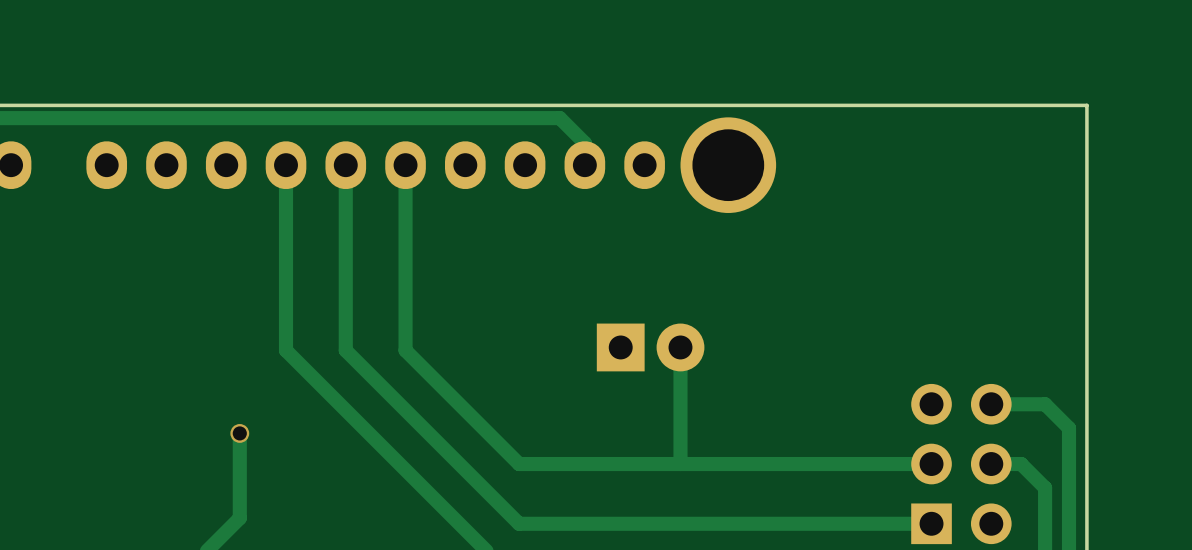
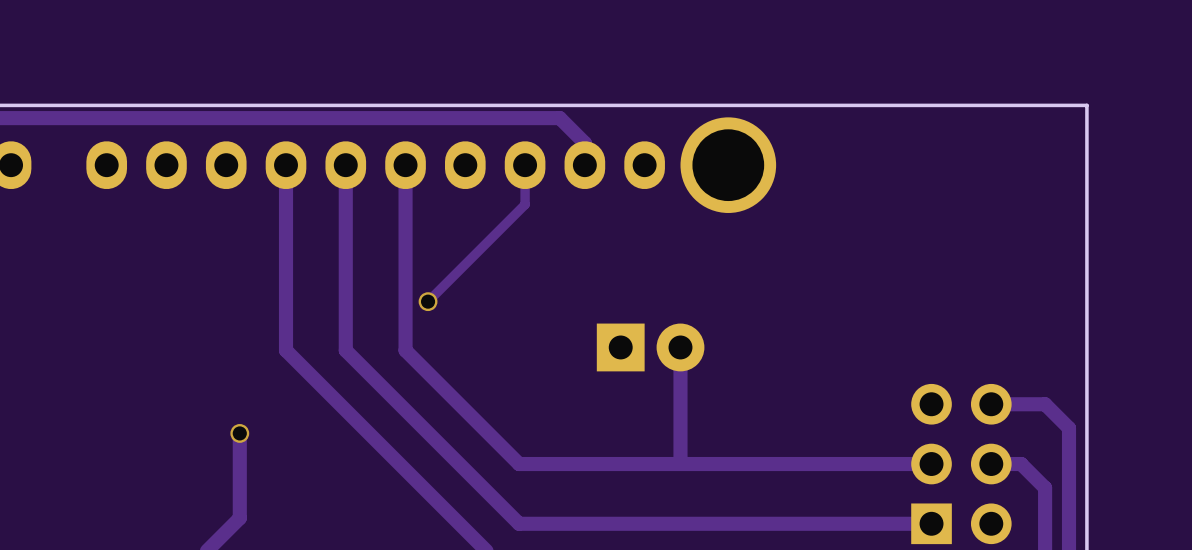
track: none -> (525, 165) (525, 204) (428, 301)
via: none -> (428, 301)

